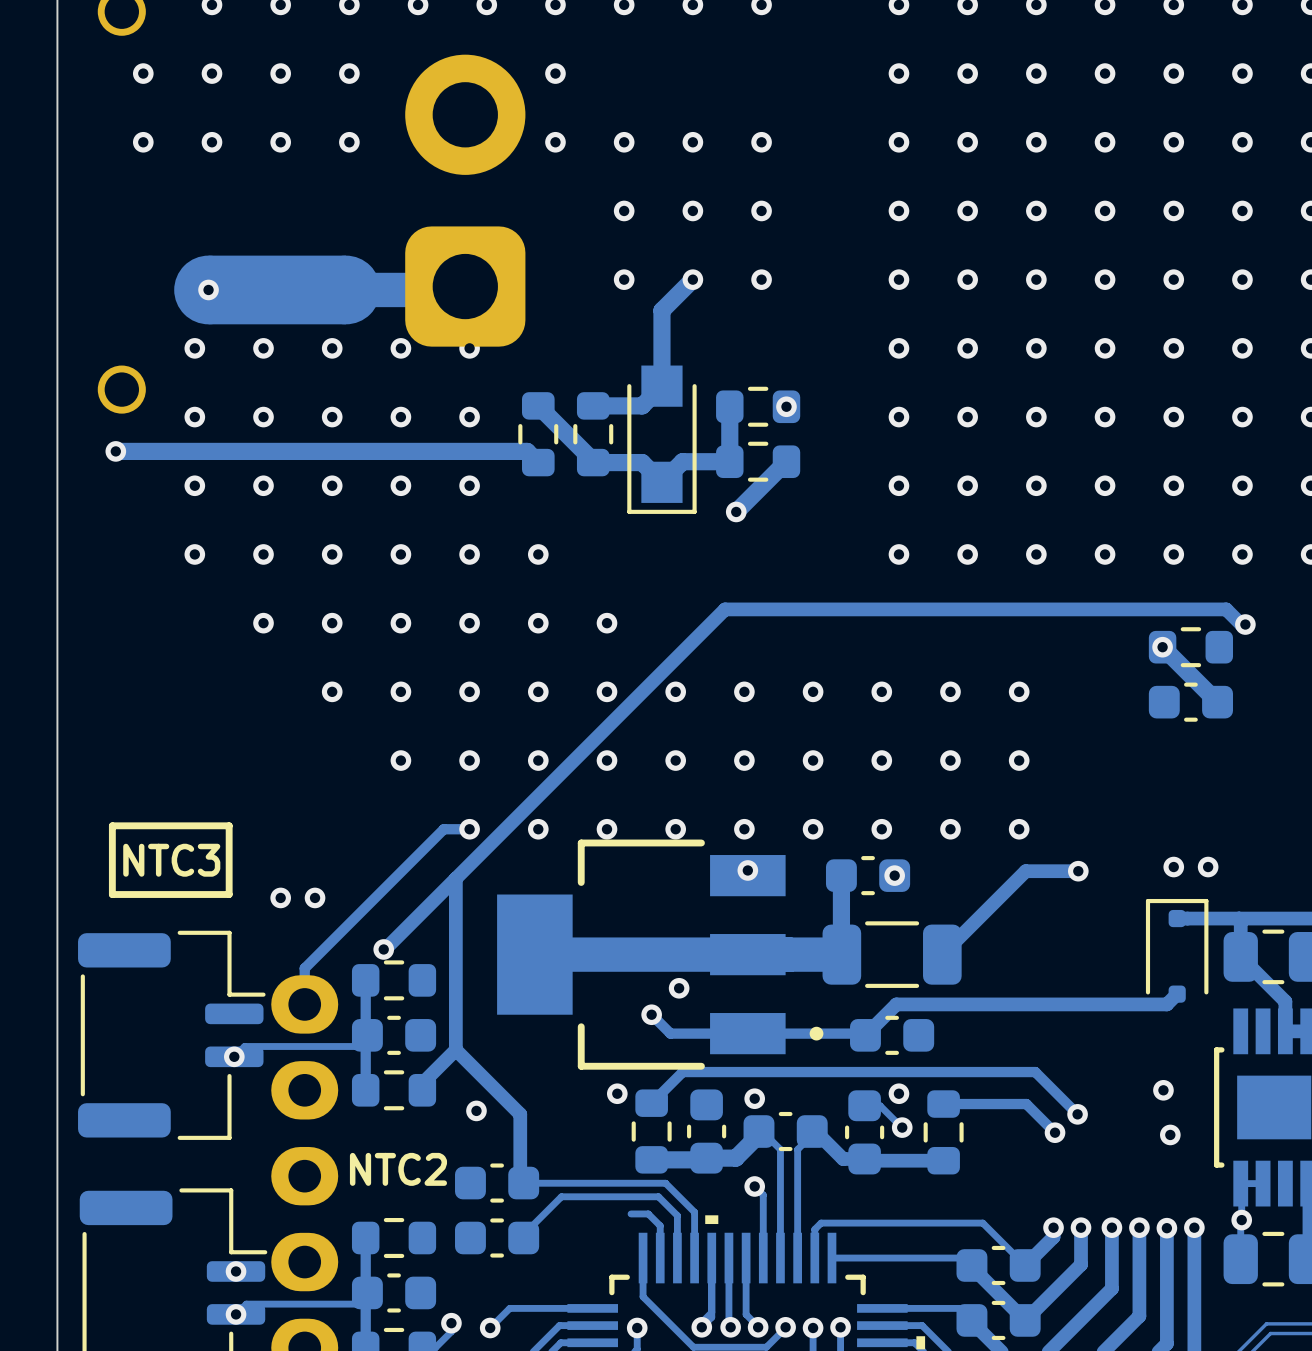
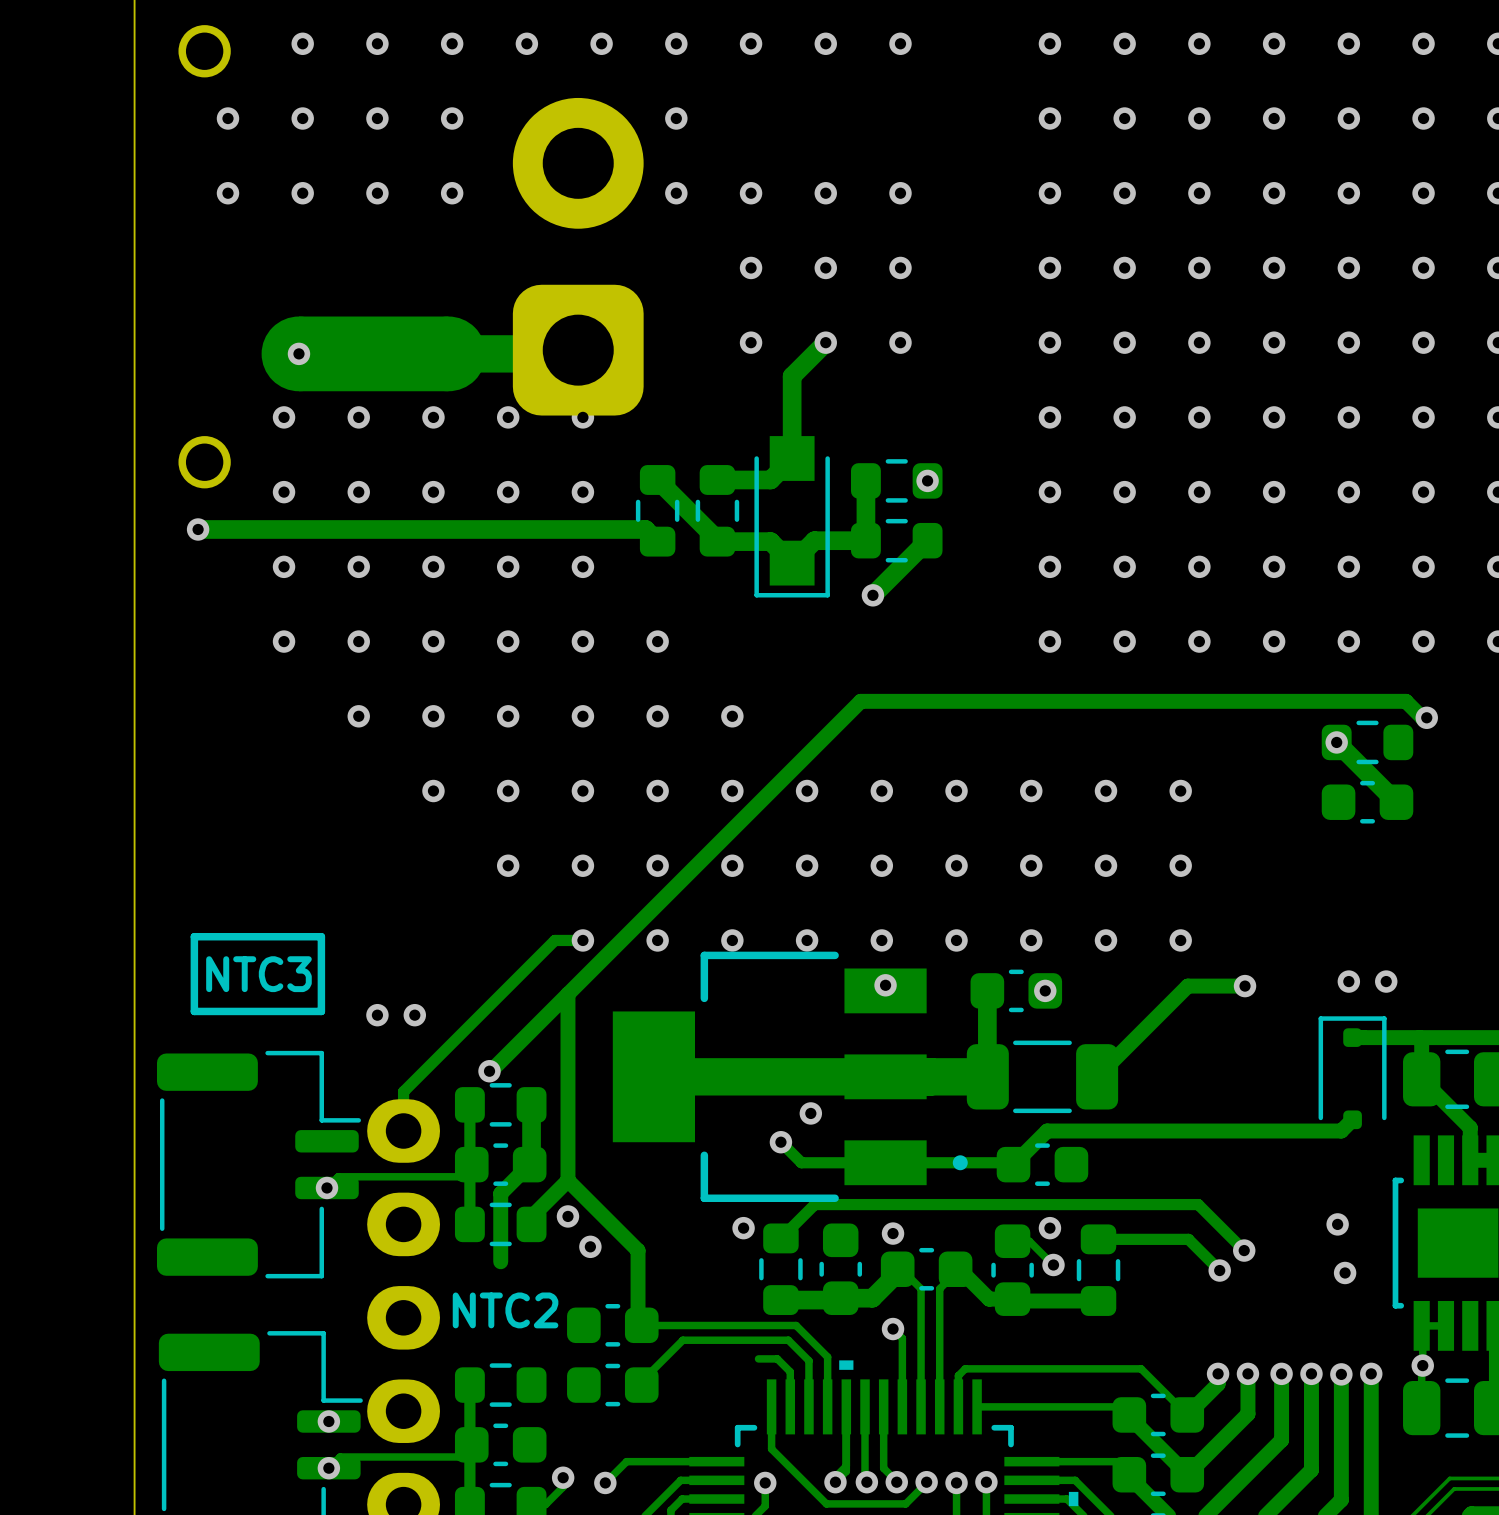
track: none -> (531, 1104) (531, 1162) (500, 1193) (500, 1261)
via: none -> (567, 1216)

